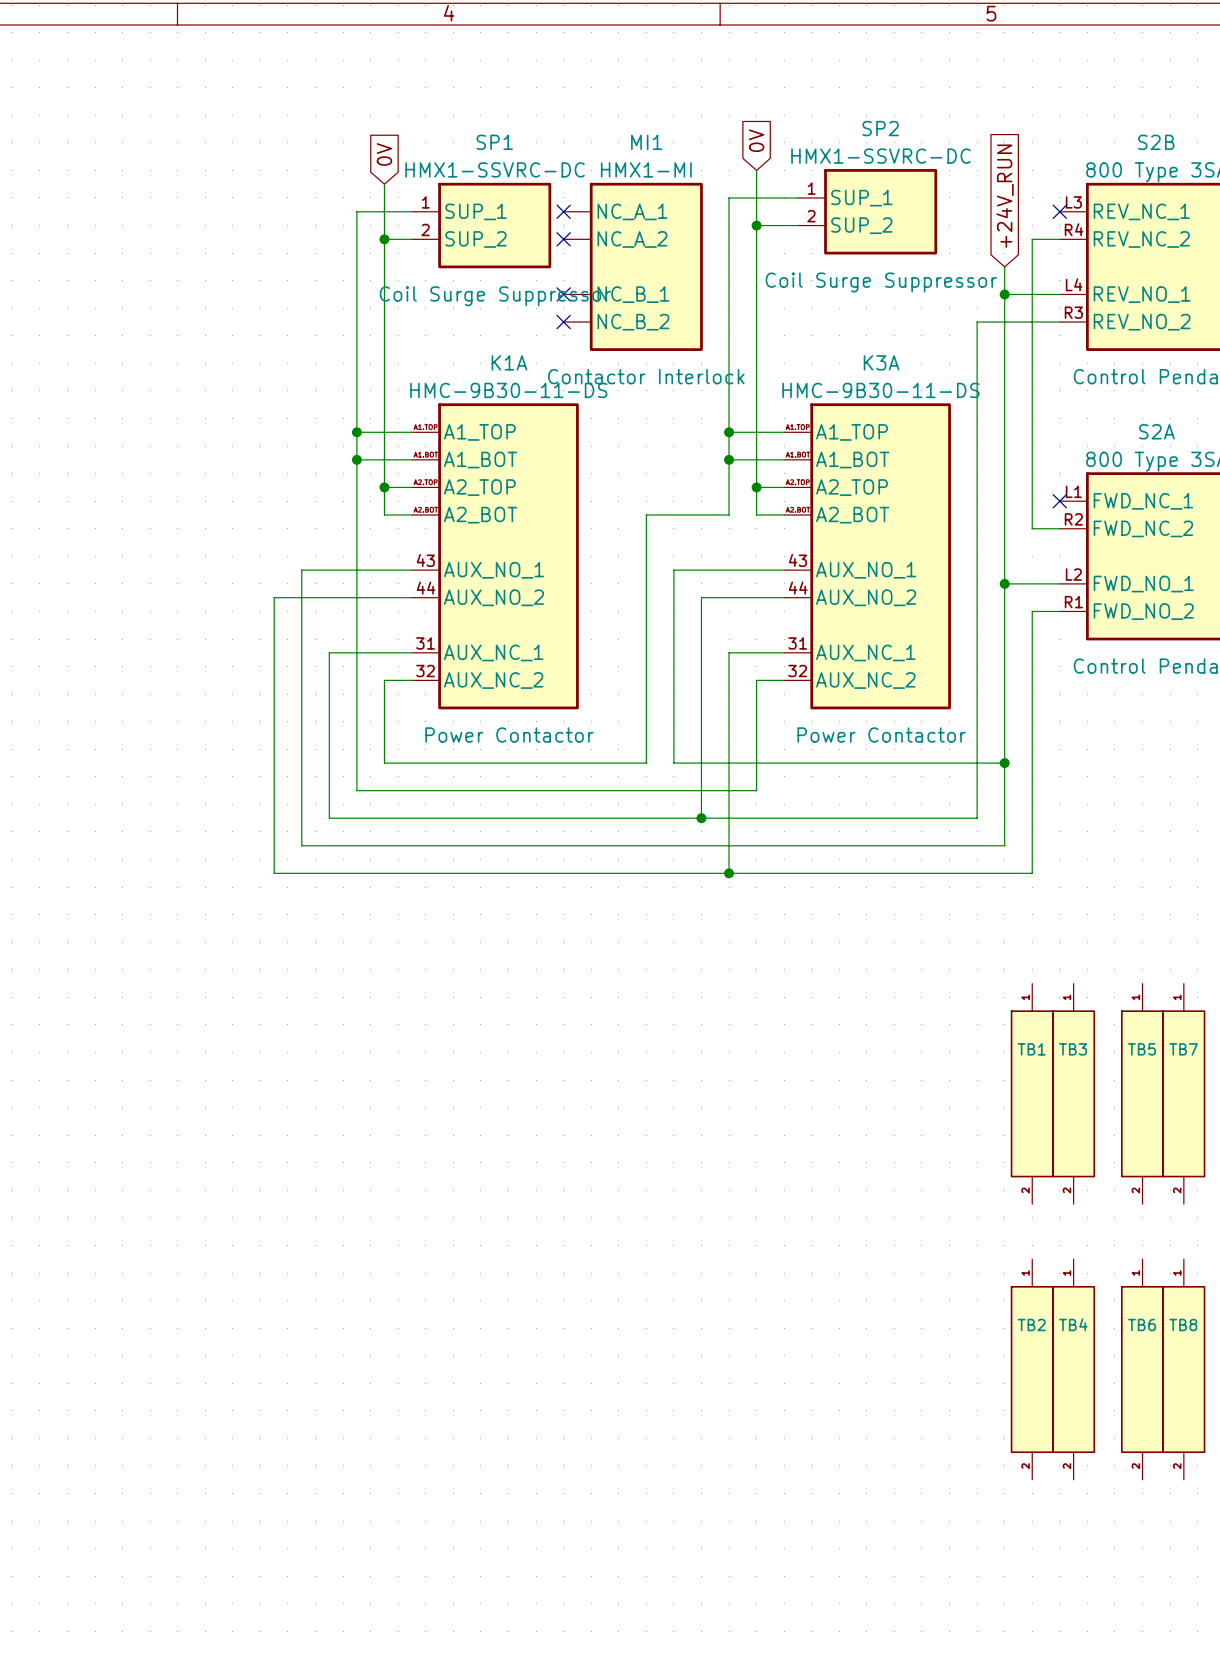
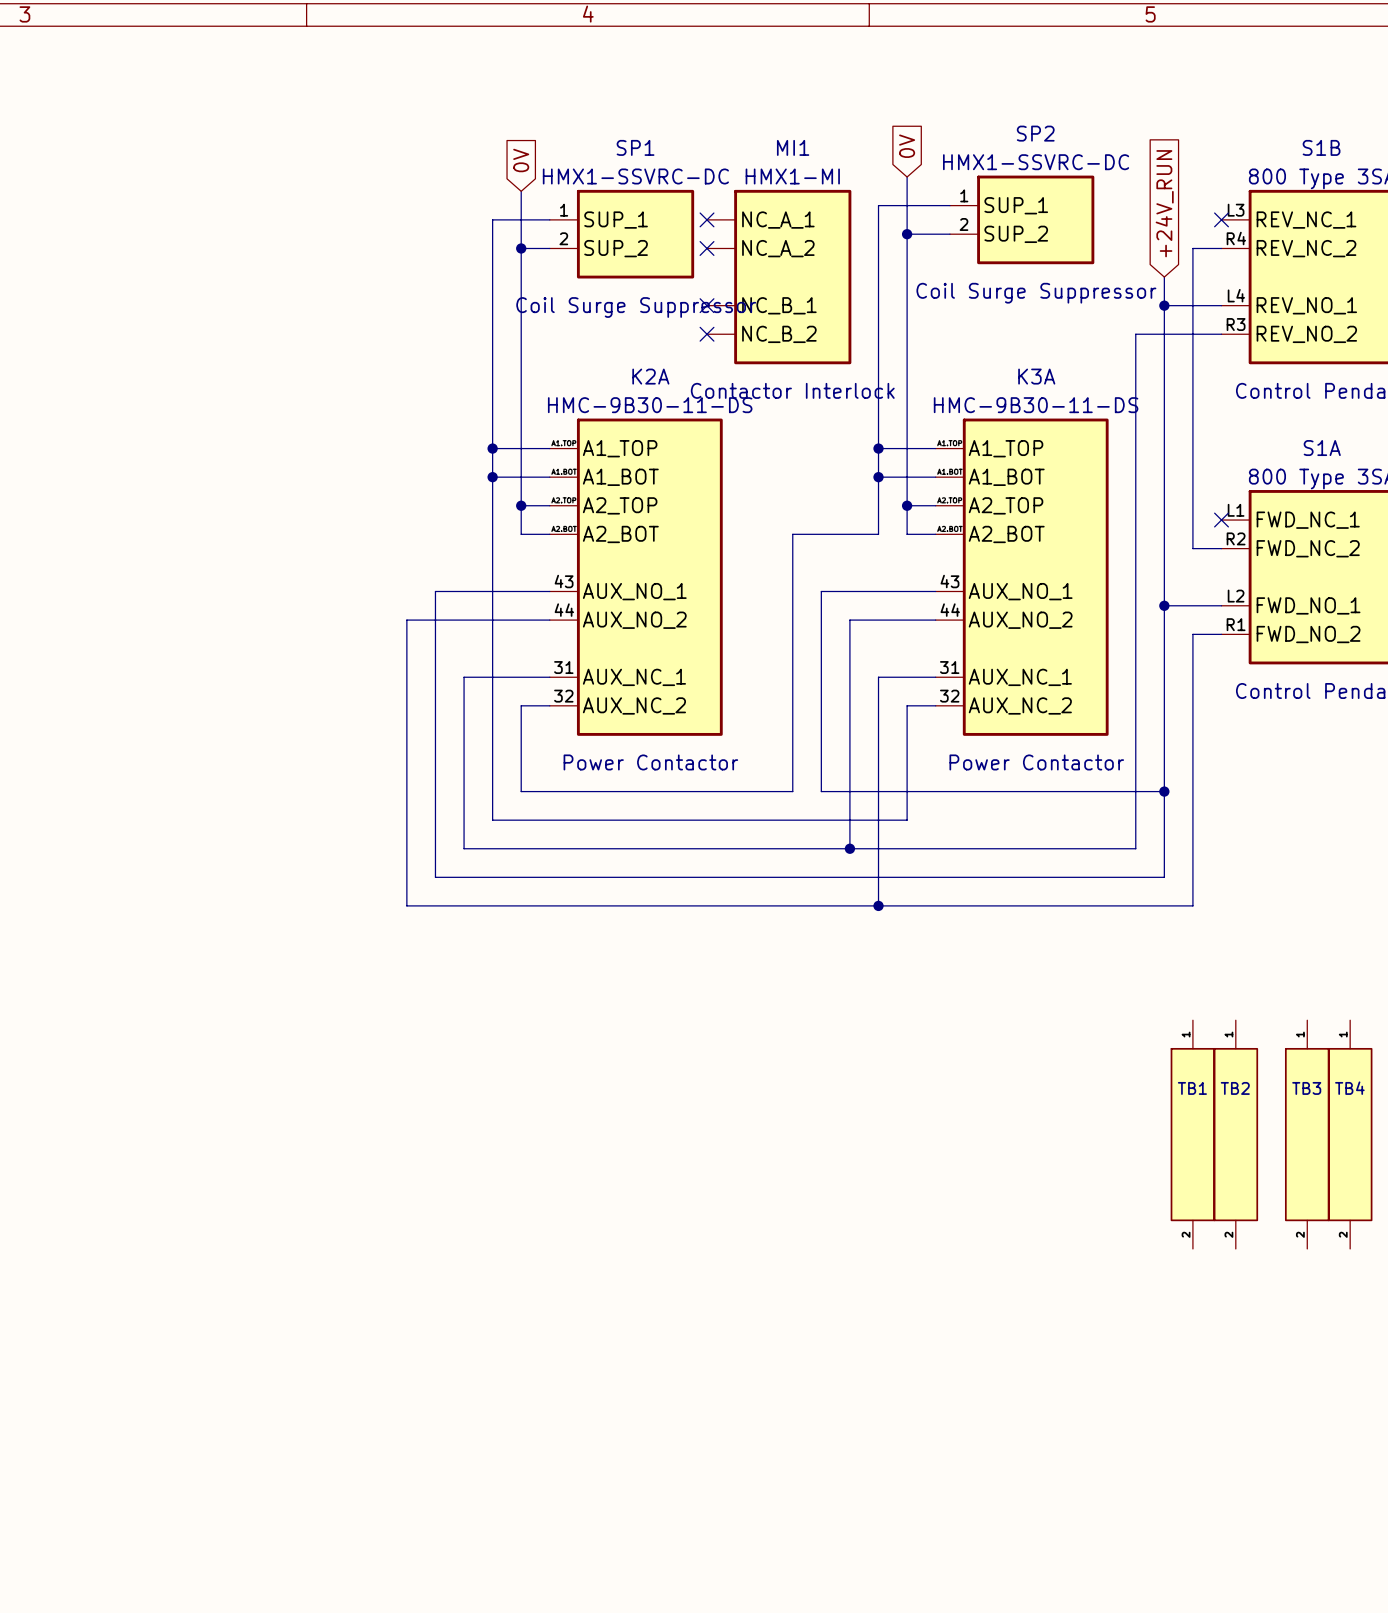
S2B name: S2B (1156, 142) -> S1B (1321, 147)
K1A name: K1A (509, 362) -> K2A (650, 376)
S2A name: S2A (1156, 431) -> S1A (1322, 448)
TB3 name: TB3 (1073, 1049) -> TB2 (1235, 1088)
TB5 name: TB5 (1141, 1049) -> TB3 (1306, 1088)
TB7 name: TB7 (1183, 1049) -> TB4 (1349, 1088)
TB2: (1032, 1369) -> none
TB4: (1073, 1369) -> none
TB6: (1142, 1369) -> none
TB8: (1183, 1369) -> none

